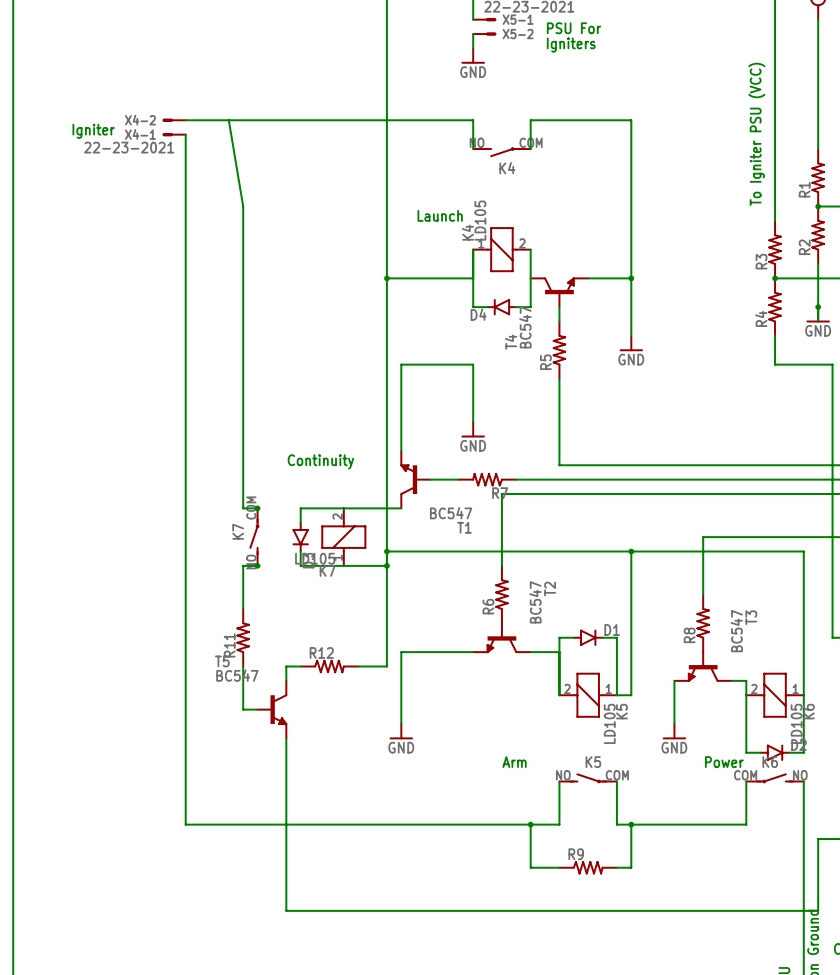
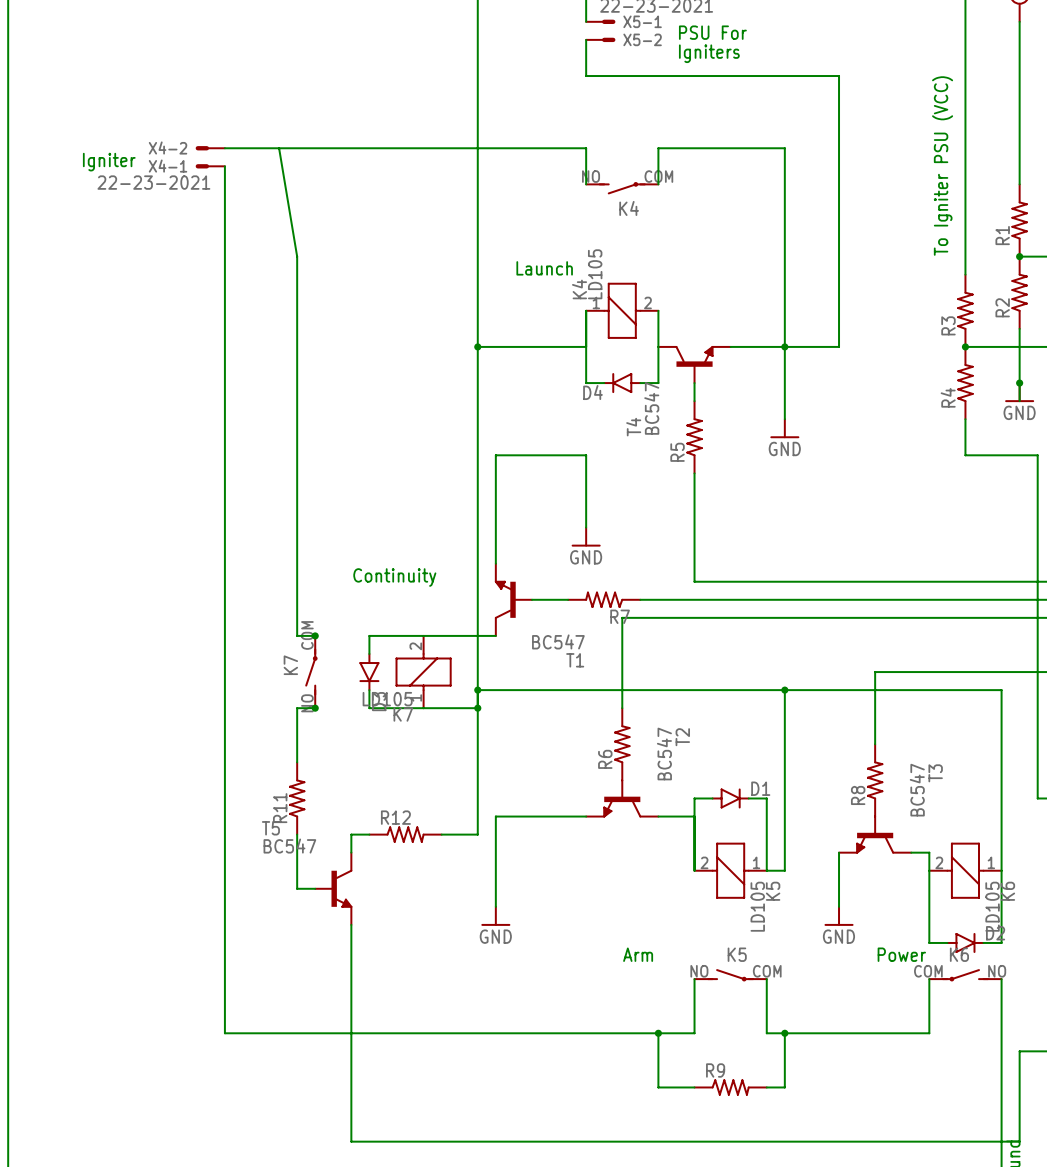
wire: none -> (586, 57) (586, 76) (839, 76) (839, 346) (784, 346)
power symbol: GND (473, 55) -> none

